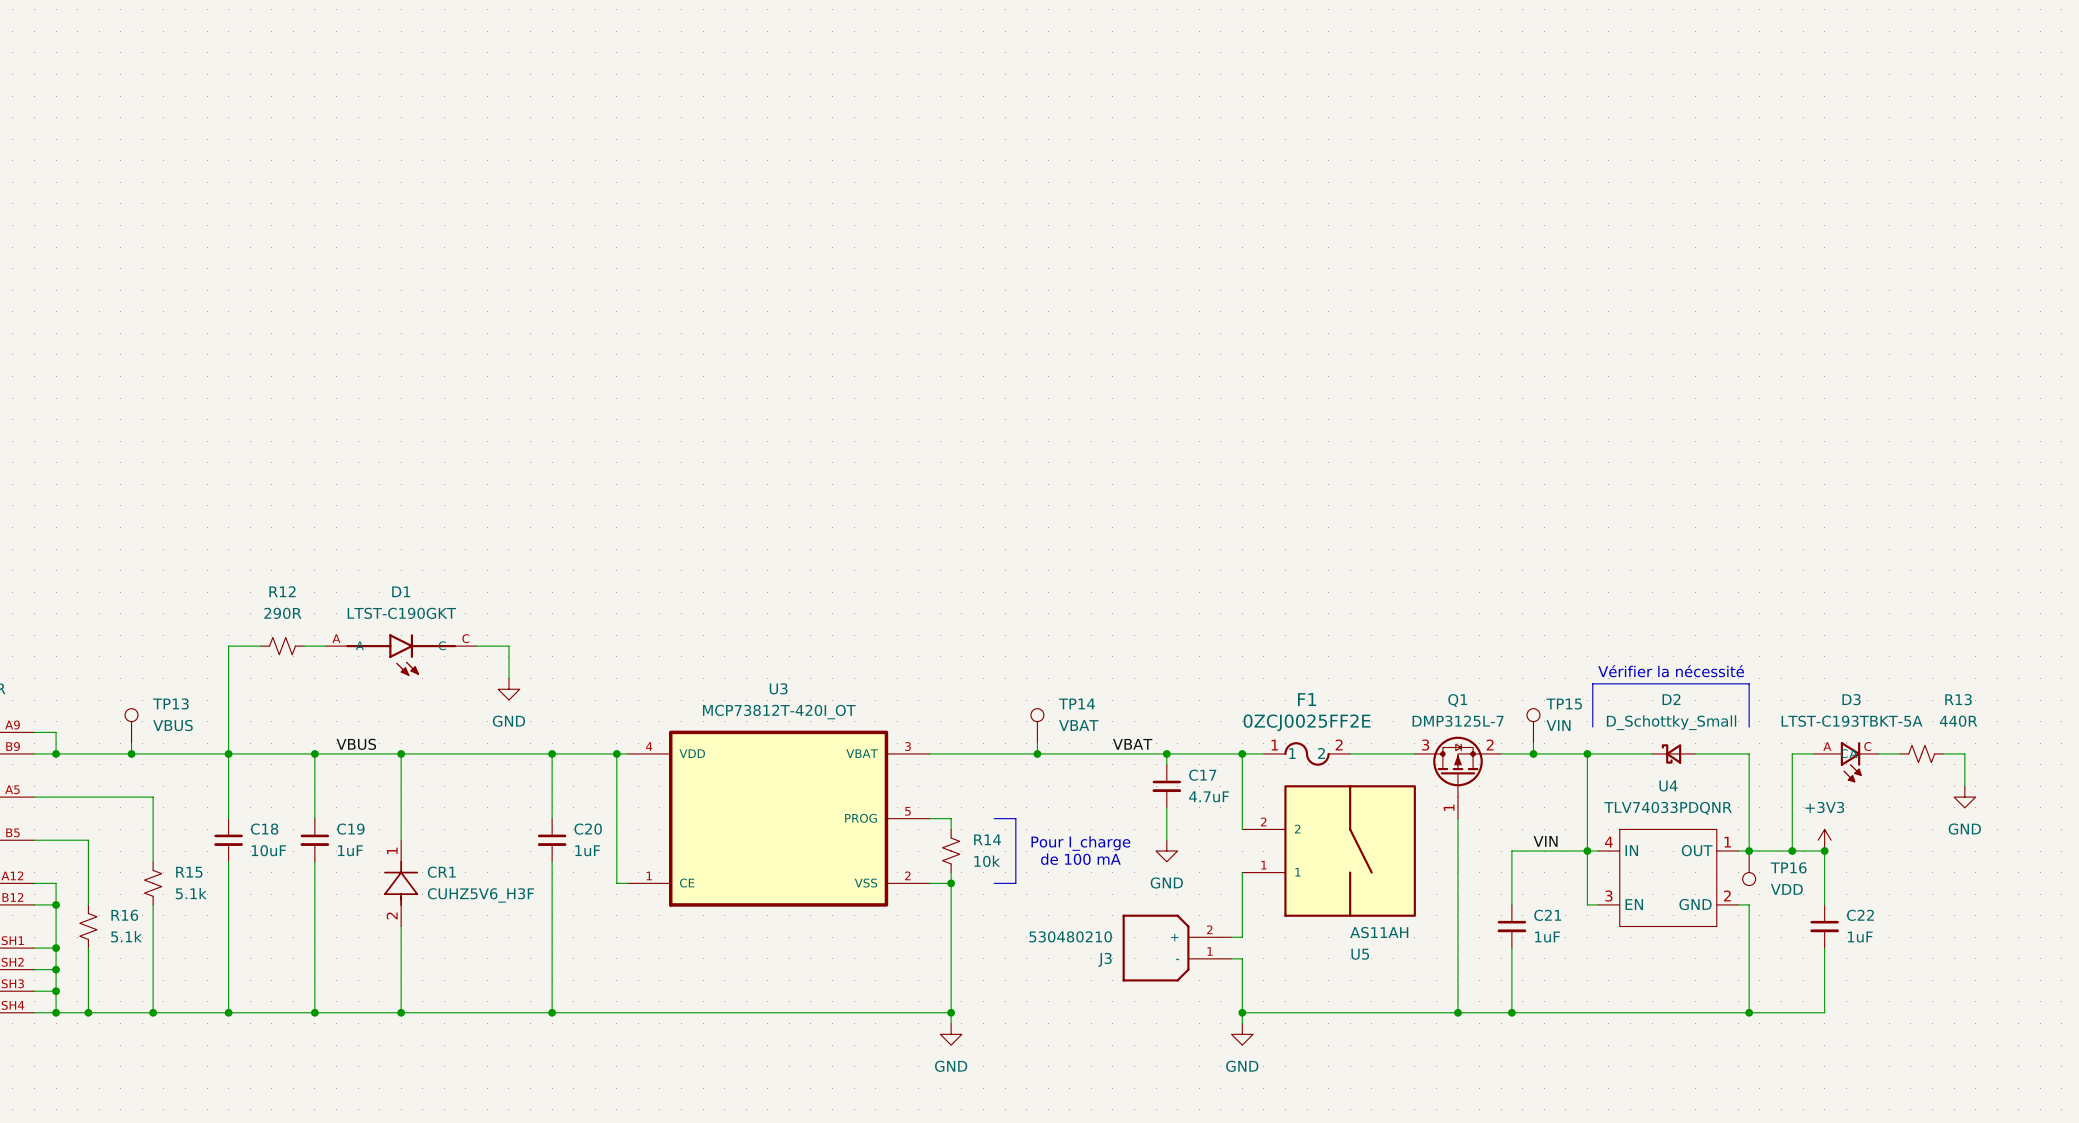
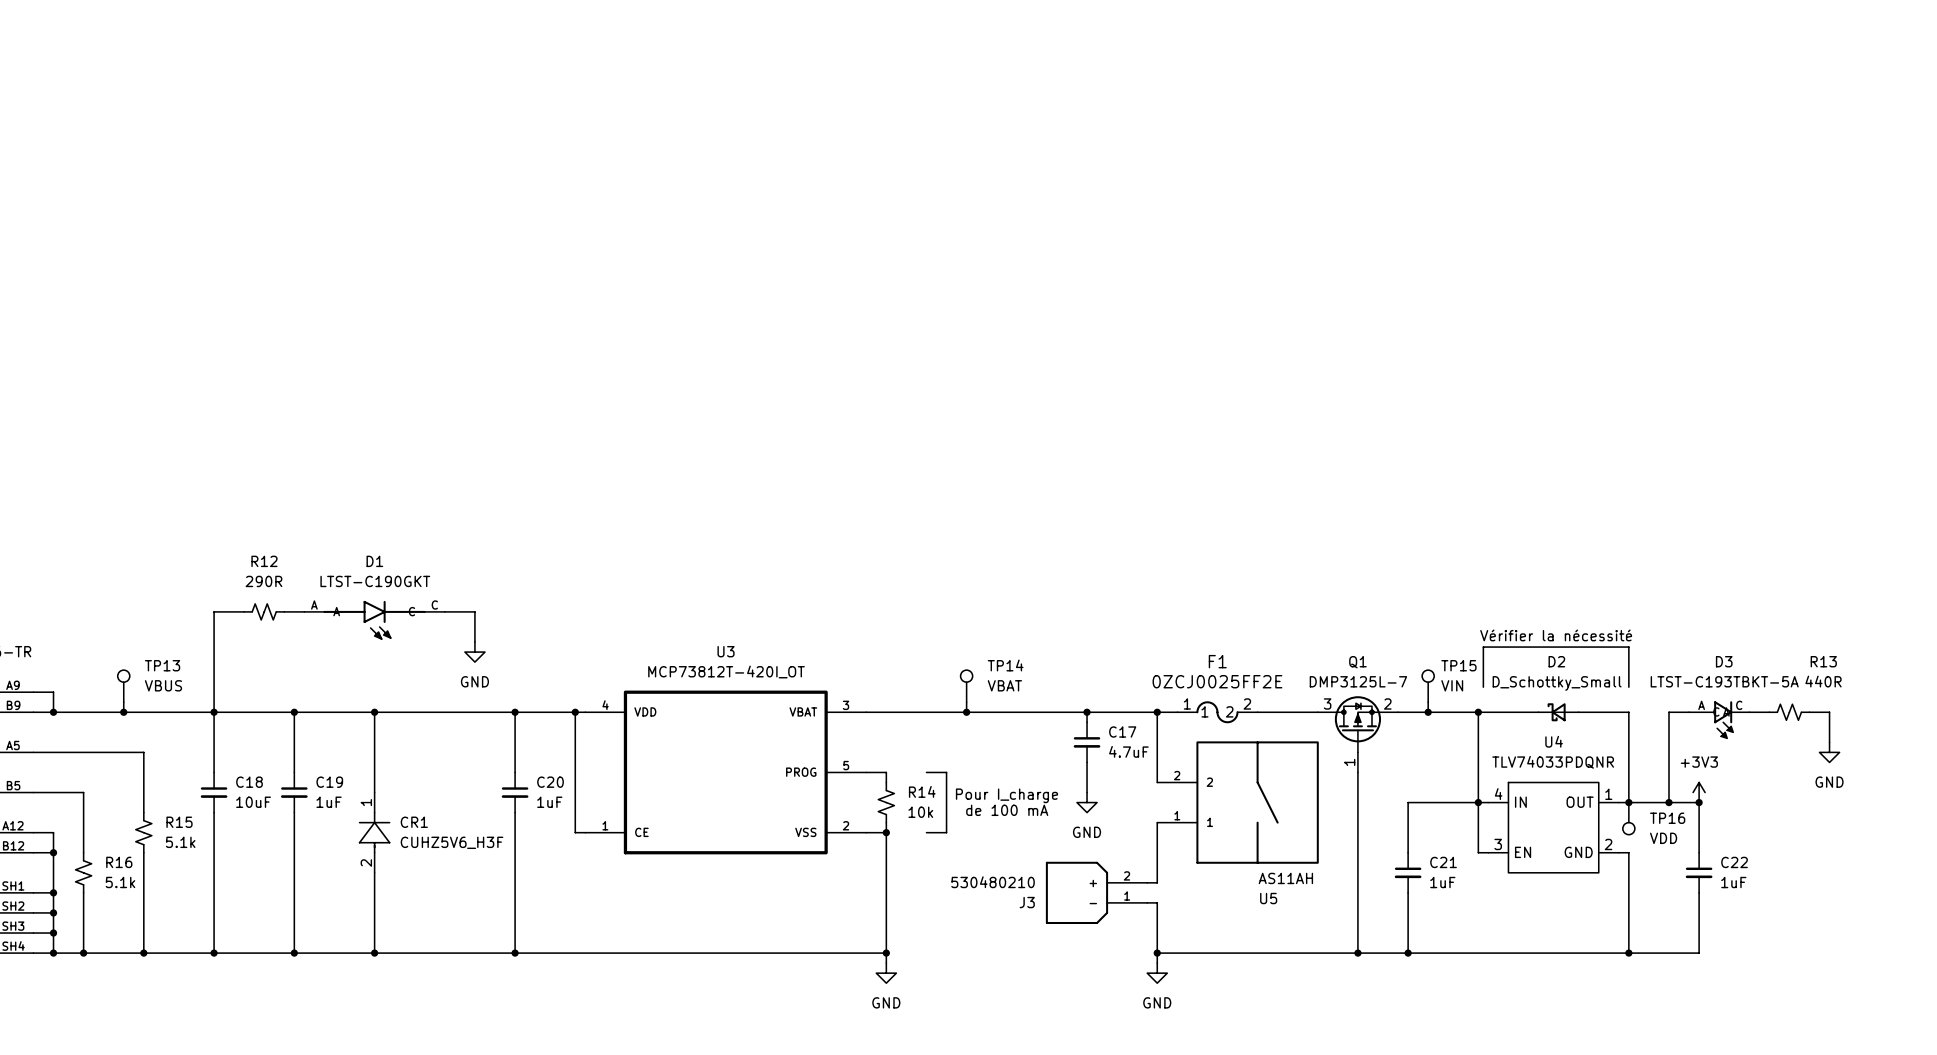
label: VBUS (356, 744) -> none
label: VBAT (1132, 744) -> none
label: VIN (1545, 841) -> none

